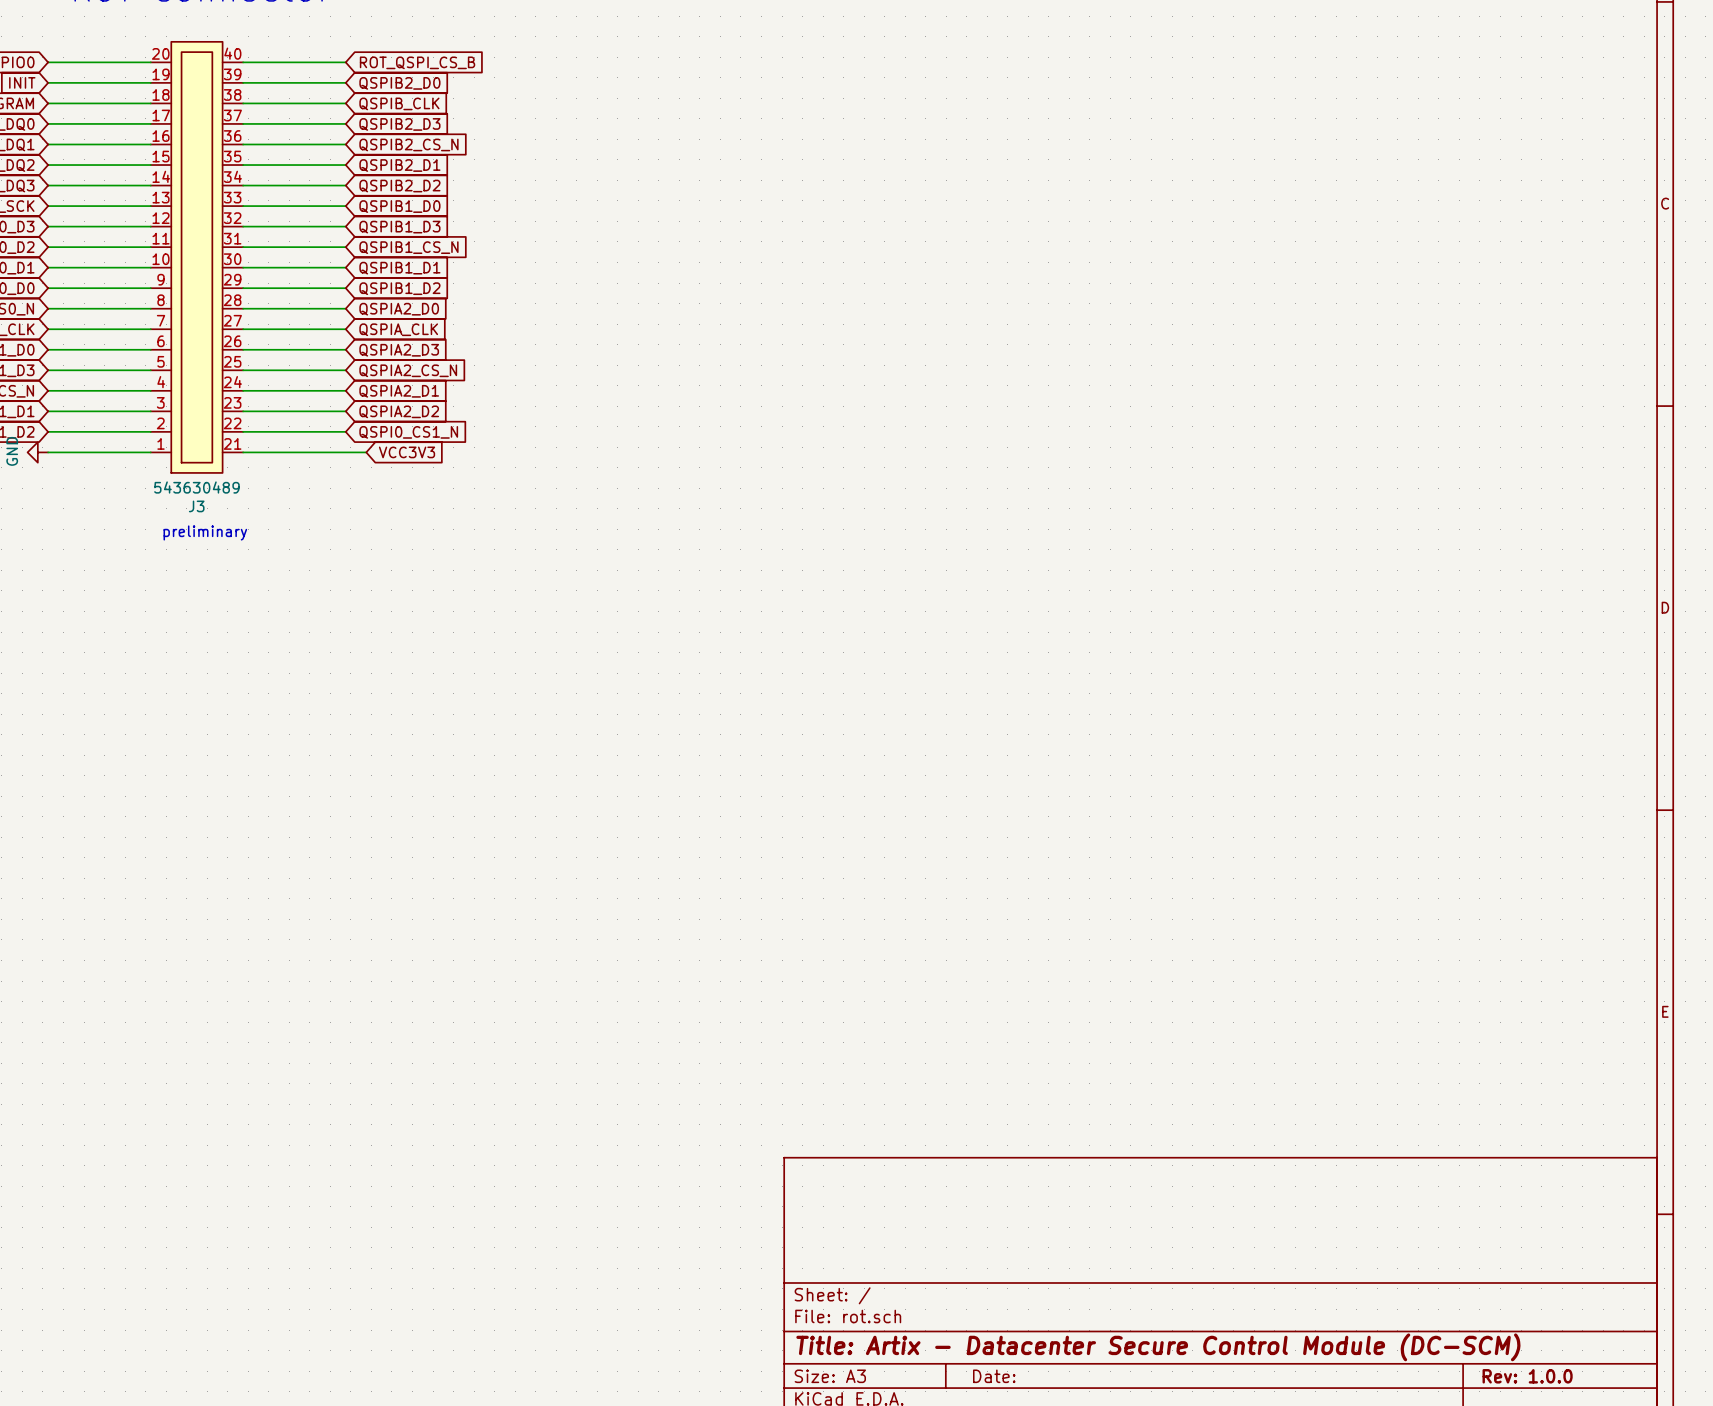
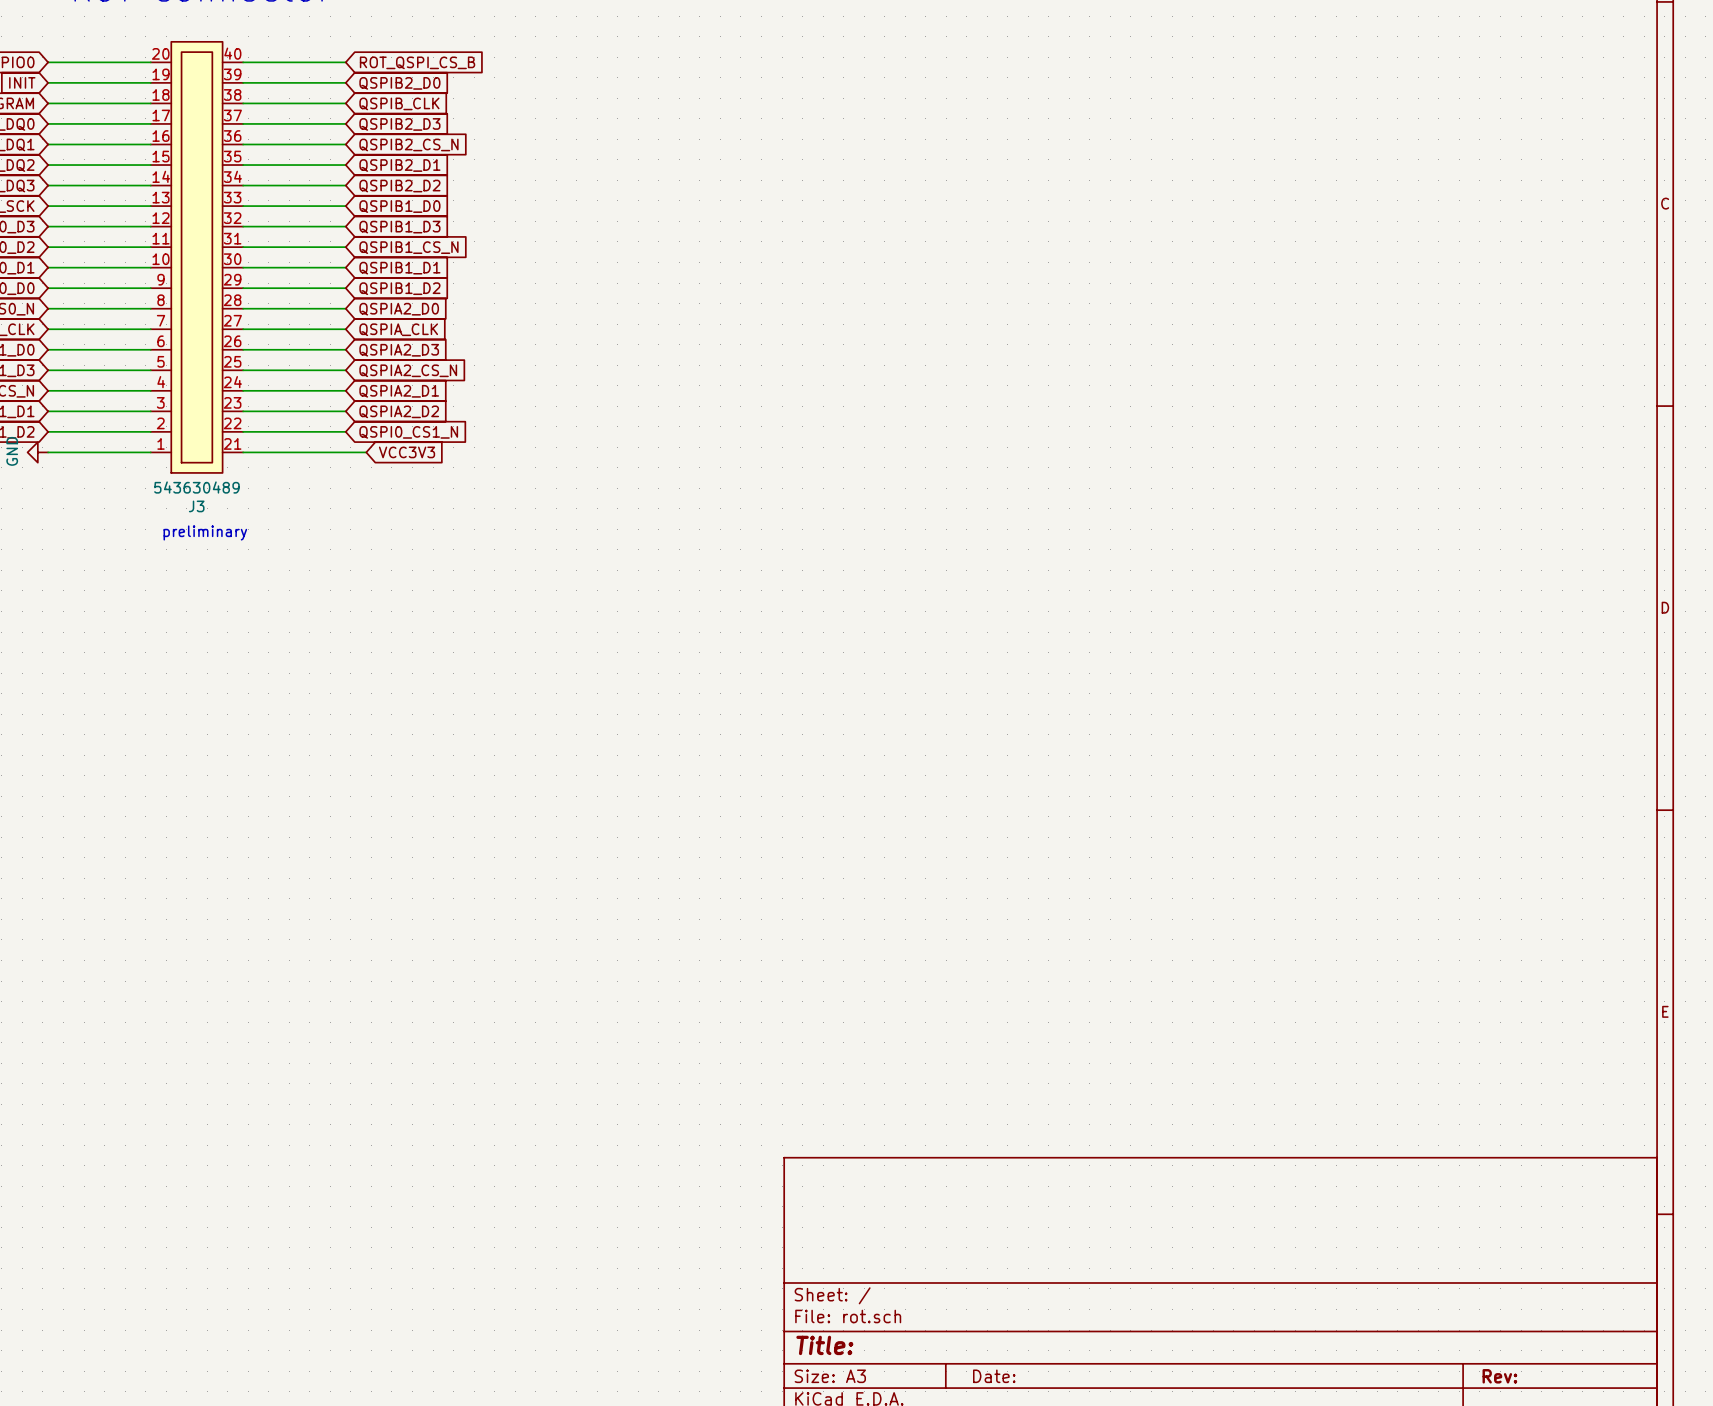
title block: Title: Artix - Datacenter Secure Control Module (DC-SCM) (1158, 1347) -> Title: (824, 1345)
title block: Rev: 1.0.0 (1527, 1376) -> Rev: (1499, 1376)

